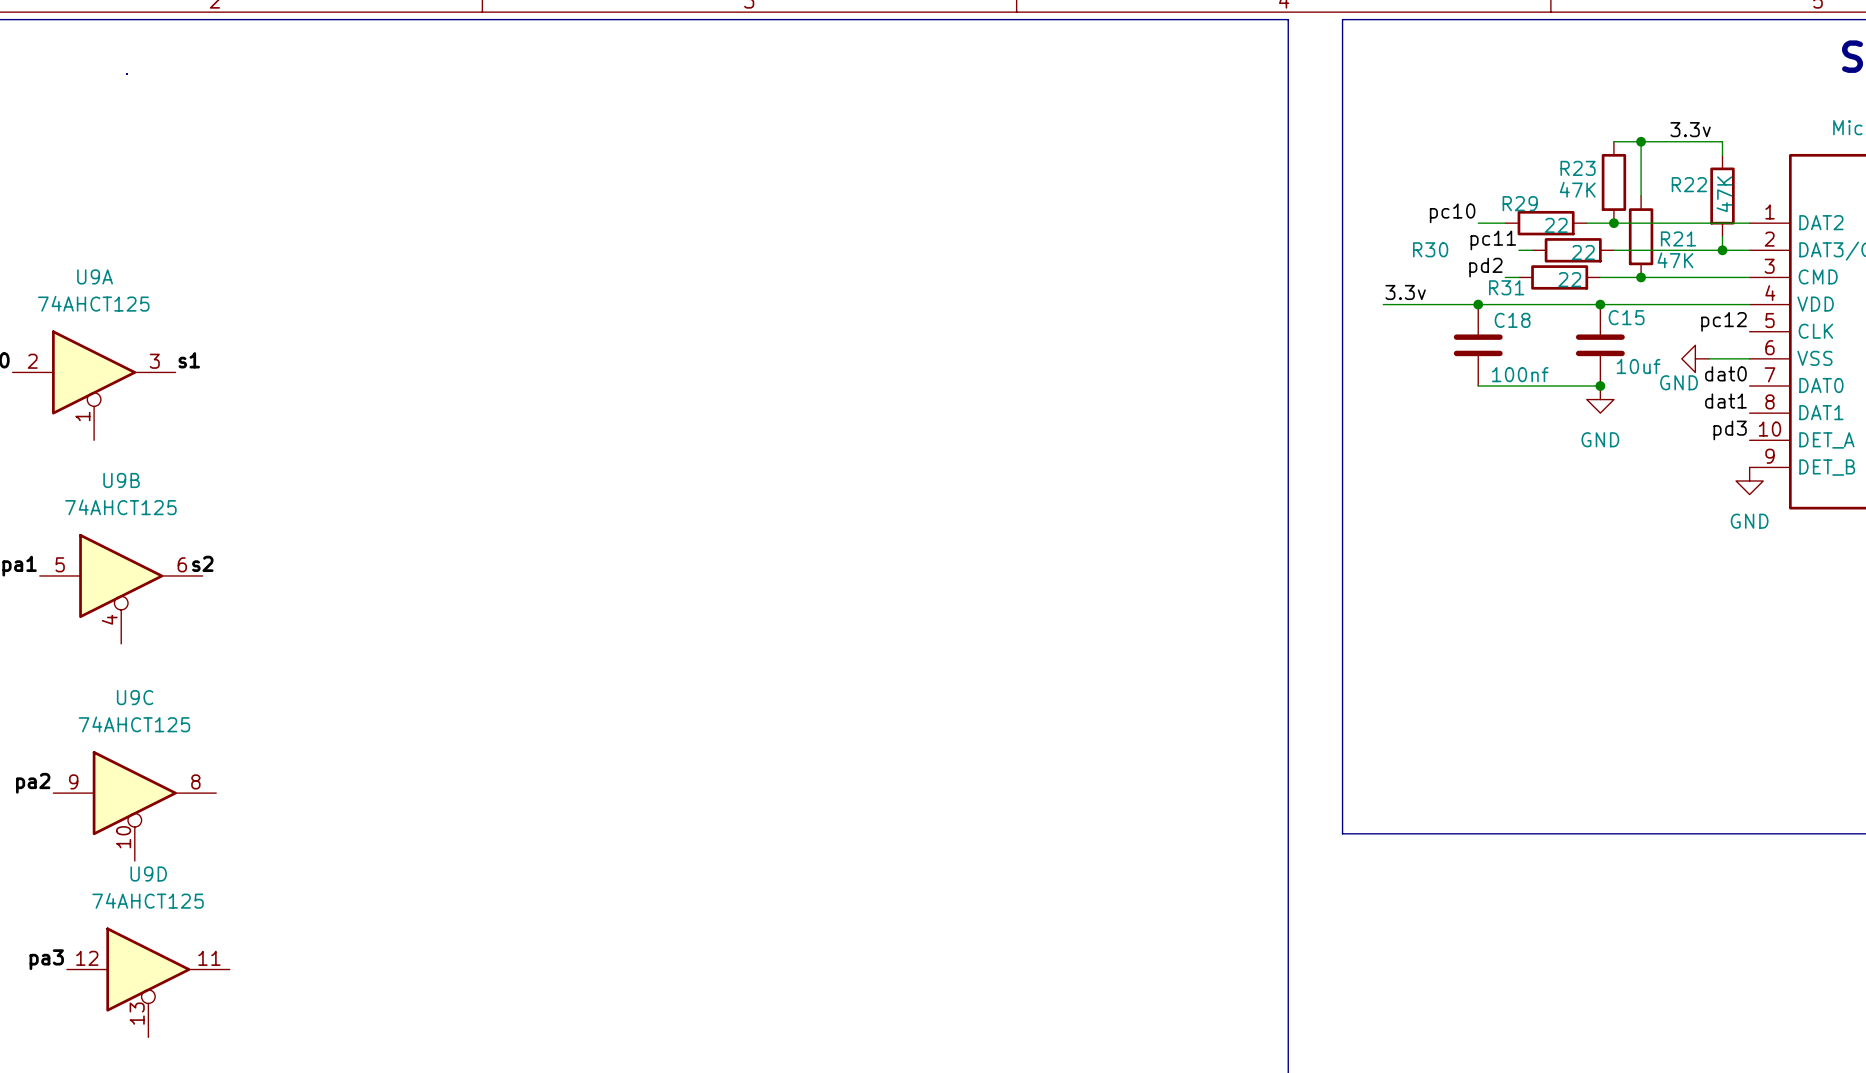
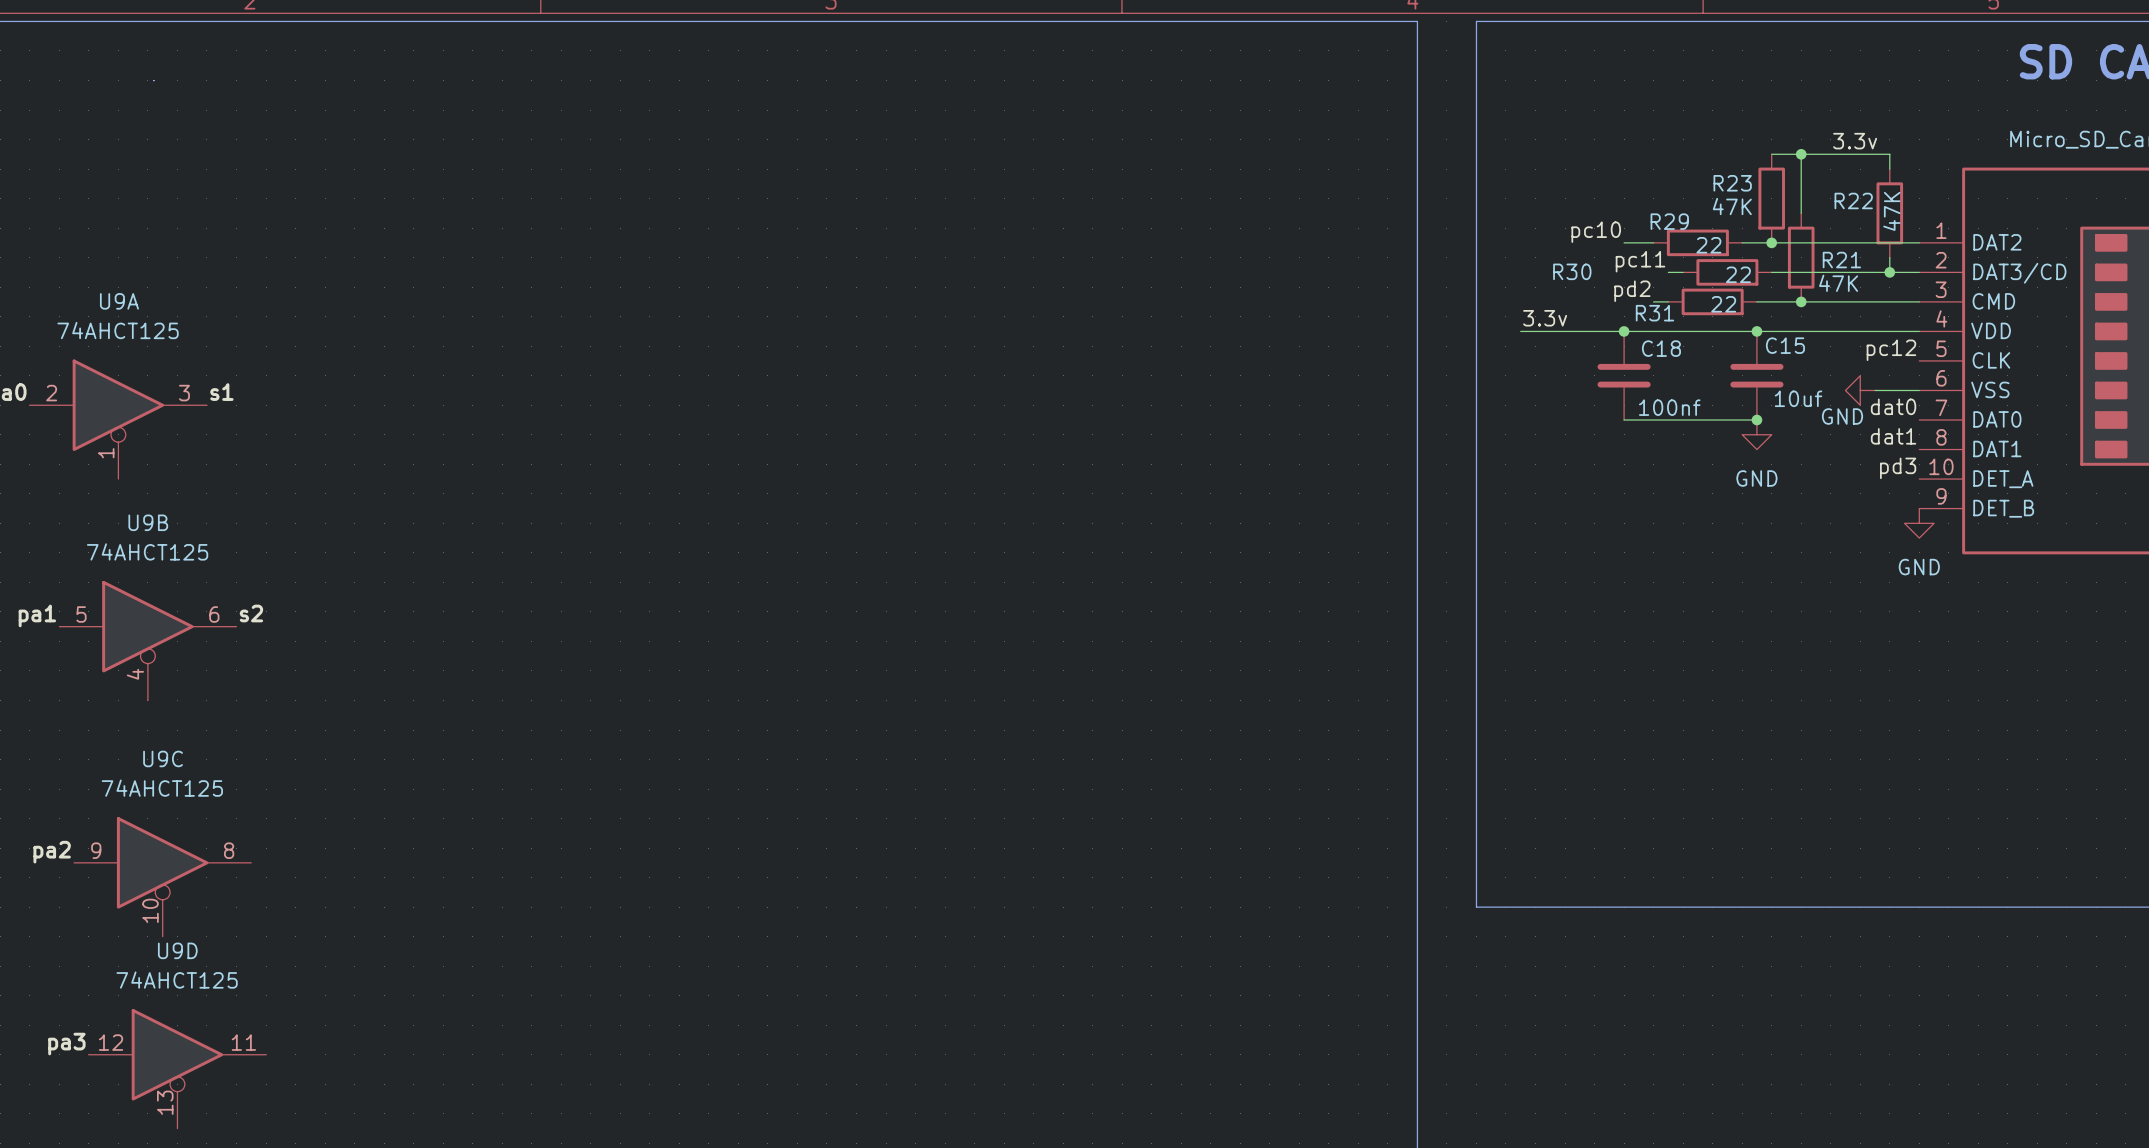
label position: s2 (202, 563) -> s2 (251, 613)

